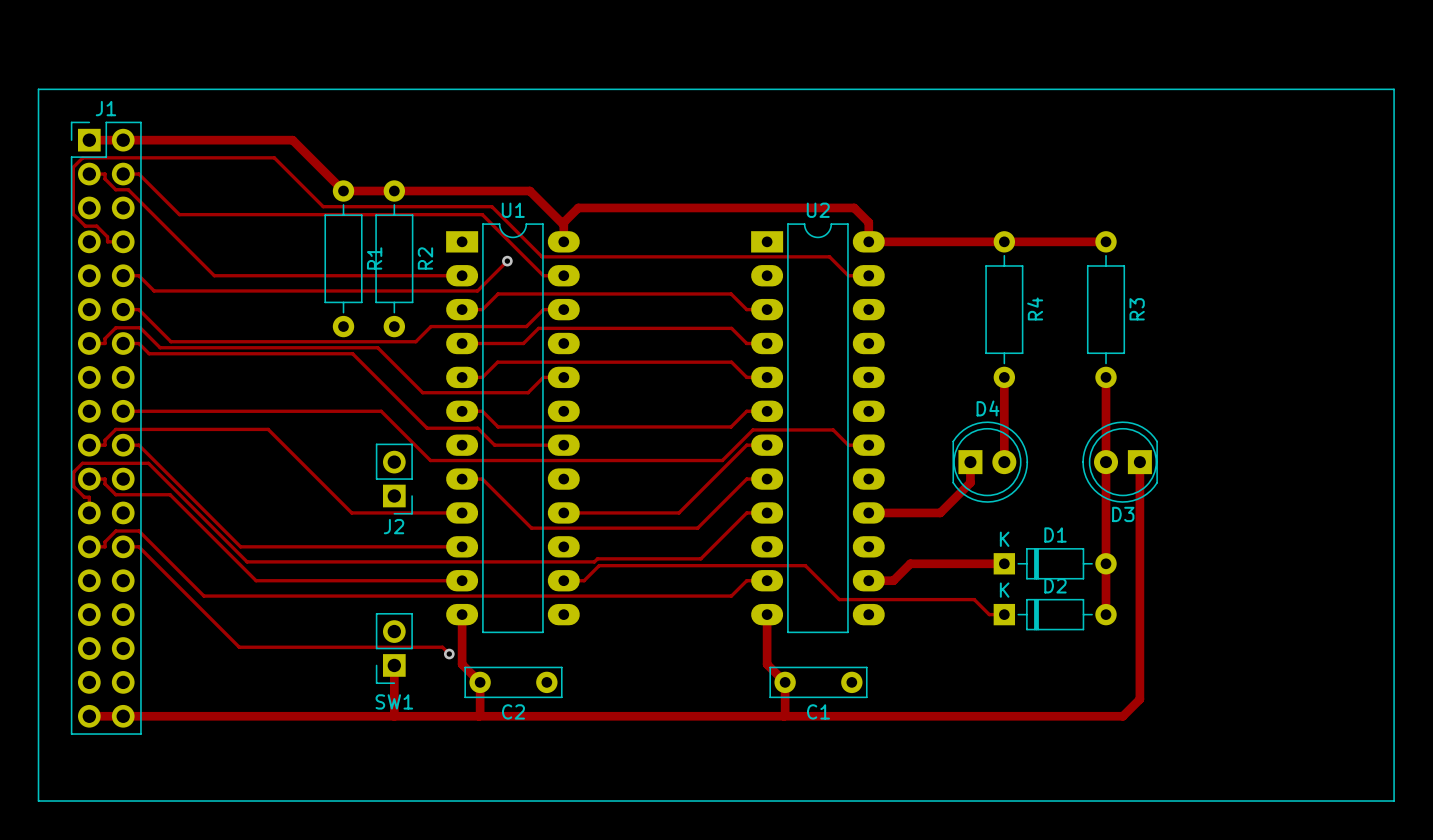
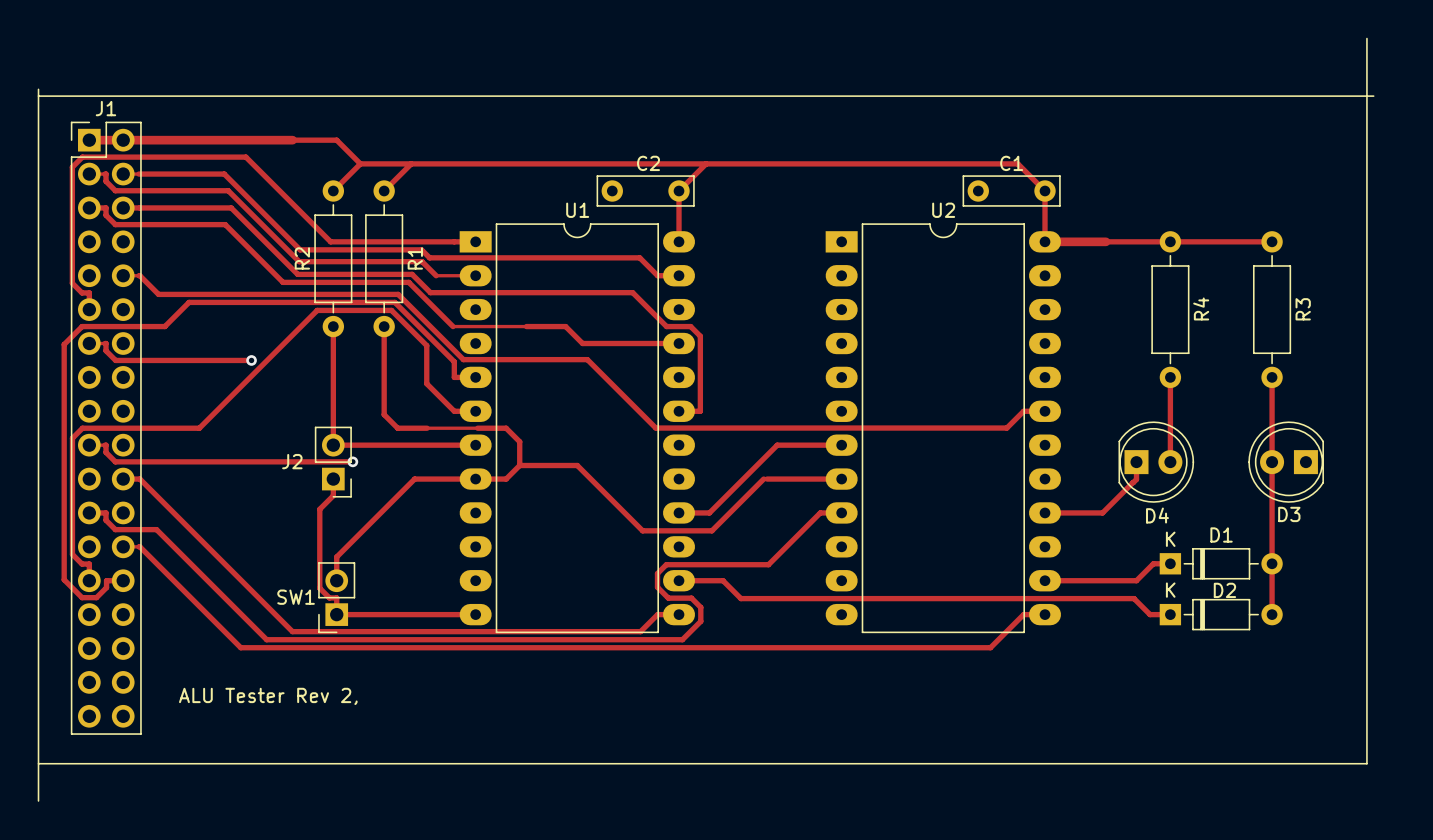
line: none -> (1366, 38) (1366, 763) (38, 763)
line: (38, 89) (1394, 89) (1394, 801) (38, 801) -> none
line: none -> (38, 96) (1373, 96)
track: (292, 140) (343, 191) (529, 191) (563, 224) -> (292, 140) (336, 140) (360, 163)
track: none -> (360, 163) (333, 191)
track: none -> (411, 163) (384, 191)
track: none -> (706, 163) (679, 191) (679, 241)
track: (105, 174) (105, 178) (115, 189) (128, 189) (214, 275) (436, 275) -> (105, 174) (106, 181) (115, 190) (228, 190) (299, 261) (422, 261) (436, 275)
track: (138, 174) (179, 214) (482, 214) (543, 275) (563, 275) -> (138, 174) (224, 174) (300, 249) (421, 249) (429, 257) (639, 257) (657, 275) (679, 275)
track: none -> (123, 207) (231, 207) (297, 274) (412, 274) (430, 292) (632, 292) (666, 326) (690, 326) (700, 336) (700, 411) (679, 411)
U1 footprint: [446, 223, 580, 634] -> [459, 223, 696, 634]
U2 footprint: [751, 223, 885, 634] -> [825, 223, 1062, 634]
track: (123, 241) (107, 241) (107, 236) (96, 226) (85, 226) (73, 214) (73, 167) (82, 157) (274, 157) (323, 206) (491, 206) (542, 256) (829, 256) (848, 275) (868, 275) -> none
track: none -> (475, 241) (330, 241) (245, 157) (82, 157) (72, 167) (72, 283) (82, 292) (89, 292) (89, 309)
track: (563, 241) (563, 222) (578, 207) (854, 207) (868, 222) (868, 241) (1045, 241) -> (360, 163) (1017, 163) (1045, 191) (1045, 241)
track: none -> (1106, 241) (1272, 241)
R1 position: (343, 258) -> (384, 258)
R2 position: (394, 258) -> (333, 258)
R2 name position: R2 (425, 258) -> R2 (302, 258)
track: (507, 261) (477, 290) (154, 290) (138, 275) -> (1045, 411) (1023, 411) (1006, 428) (655, 428) (587, 359) (463, 359) (398, 294) (158, 294) (138, 275)
via: (507, 261) -> none
track: (123, 309) (138, 309) (171, 341) (415, 341) (431, 326) (453, 326) -> (89, 207) (106, 207) (106, 215) (115, 224) (225, 224) (283, 282) (408, 282) (453, 326)
track: (462, 309) (482, 309) (498, 293) (731, 293) (746, 309) (767, 309) -> none
track: (563, 309) (543, 309) (526, 326) -> (679, 343) (582, 343) (565, 326) (526, 326)
R4 position: (1004, 309) -> (1170, 309)
R3 position: (1106, 309) -> (1272, 309)
track: none -> (333, 326) (333, 445) (475, 445)
track: (105, 343) (105, 338) (115, 327) (140, 327) (160, 347) (377, 347) (422, 392) (528, 392) (543, 377) (563, 377) -> (105, 343) (106, 350) (115, 360) (251, 360)
track: (123, 343) (138, 343) (149, 353) (352, 353) (427, 428) -> (384, 326) (384, 414) (397, 428) (427, 428)
track: (462, 343) (523, 343) (538, 328) (731, 328) (746, 343) (767, 343) -> none
via: none -> (251, 360)
track: none -> (462, 377) (454, 377) (454, 361) (394, 302) (189, 302) (164, 326) (82, 326) (64, 344) (64, 579) (82, 597) (96, 597) (106, 587) (106, 580) (123, 580)
track: (475, 377) (482, 377) (497, 362) (731, 362) (746, 377) (767, 377) -> none
track: (1004, 377) (1004, 462) -> (1170, 377) (1170, 462)
track: (1106, 377) (1106, 614) -> (1272, 377) (1272, 614)
D4 name position: D4 (988, 408) -> D4 (1157, 515)
track: (123, 411) (381, 411) (430, 460) (722, 460) (752, 429) (833, 429) (848, 445) (868, 445) -> none
track: none -> (462, 411) (454, 411) (426, 383) (426, 345) (391, 310) (317, 310) (199, 428) (82, 428) (72, 438) (72, 554) (82, 564) (89, 564) (89, 580)
track: (475, 411) (482, 411) (498, 426) (731, 426) (746, 411) (767, 411) -> none
track: (477, 428) (494, 445) (563, 445) -> (477, 428) (506, 428) (519, 441) (519, 465)
track: (105, 445) (105, 440) (115, 429) (268, 429) (351, 512) (462, 512) -> (105, 445) (106, 452) (115, 461) (352, 461)
track: (123, 445) (138, 445) (240, 546) (462, 546) -> none
track: (767, 445) (746, 445) (678, 512) (563, 512) -> none
track: none -> (841, 445) (777, 445) (709, 512) (679, 512)
via: none -> (352, 461)
track: (970, 462) (970, 482) (940, 512) (868, 512) -> none
D4 position: (990, 462) -> (1156, 462)
D3 position: (1120, 462) -> (1286, 462)
track: none -> (1136, 462) (1136, 479) (1102, 512) (1045, 512)
track: (1139, 462) (1139, 699) (1122, 716) (89, 716) -> none
track: none -> (519, 465) (506, 479) (482, 479)
track: (89, 479) (105, 479) (105, 483) (115, 494) (170, 494) (256, 580) (462, 580) -> none
track: none -> (123, 479) (139, 479) (292, 631) (640, 631) (657, 614) (679, 614)
track: none -> (333, 479) (333, 495) (319, 509) (319, 588) (329, 597) (336, 597) (336, 614) (475, 614)
J2 position: (394, 479) -> (333, 462)
track: none -> (462, 479) (414, 479) (336, 557) (336, 580)
track: (482, 479) (531, 528) (697, 528) (746, 479) (763, 479) -> (519, 465) (577, 465) (642, 530) (711, 530) (763, 479)
track: none -> (767, 479) (841, 479)
track: (89, 512) (89, 497) (84, 497) (73, 486) (73, 472) (82, 463) (148, 463) (247, 561) (594, 561) (597, 558) (700, 558) (746, 512) (767, 512) -> (89, 512) (106, 512) (106, 520) (115, 529) (156, 529) (266, 639) (682, 639) (700, 621) (700, 607) (691, 598) (668, 598) (657, 587) (657, 573) (666, 564) (768, 564) (820, 512) (841, 512)
J2 name position: J2 (394, 526) -> J2 (292, 461)
track: (89, 546) (105, 546) (105, 541) (115, 531) (138, 531) (203, 596) (731, 596) (746, 580) (767, 580) -> none
track: (138, 546) (239, 647) (442, 647) (449, 654) -> (138, 546) (240, 647) (990, 647) (1023, 614) (1045, 614)
track: (1004, 563) (910, 563) (893, 580) (868, 580) -> none
D1 position: (1055, 563) -> (1221, 563)
track: none -> (1170, 563) (1153, 563) (1136, 580) (1045, 580)
track: (563, 580) (584, 580) (599, 565) (805, 565) (839, 599) (974, 599) (989, 614) (1004, 614) -> none
track: none -> (679, 580) (723, 580) (740, 598) (1134, 598) (1150, 614) (1170, 614)
D2 name position: D2 (1055, 585) -> D2 (1224, 590)
track: (462, 614) (462, 664) (480, 682) (479, 716) -> none
track: (767, 614) (767, 664) (785, 682) (784, 716) -> none
D2 position: (1055, 614) -> (1221, 614)
SW1 position: (394, 648) -> (336, 597)
via: (449, 654) -> none
track: (394, 665) (394, 716) -> none
C2 position: (513, 682) -> (645, 191)
C1 position: (818, 682) -> (1011, 191)
text: none -> ALU Tester Rev 2, (268, 696)
SW1 name position: SW1 (394, 701) -> SW1 (296, 597)
C2 name position: C2 (513, 711) -> C2 (648, 163)
C1 name position: C1 (818, 711) -> C1 (1011, 163)

